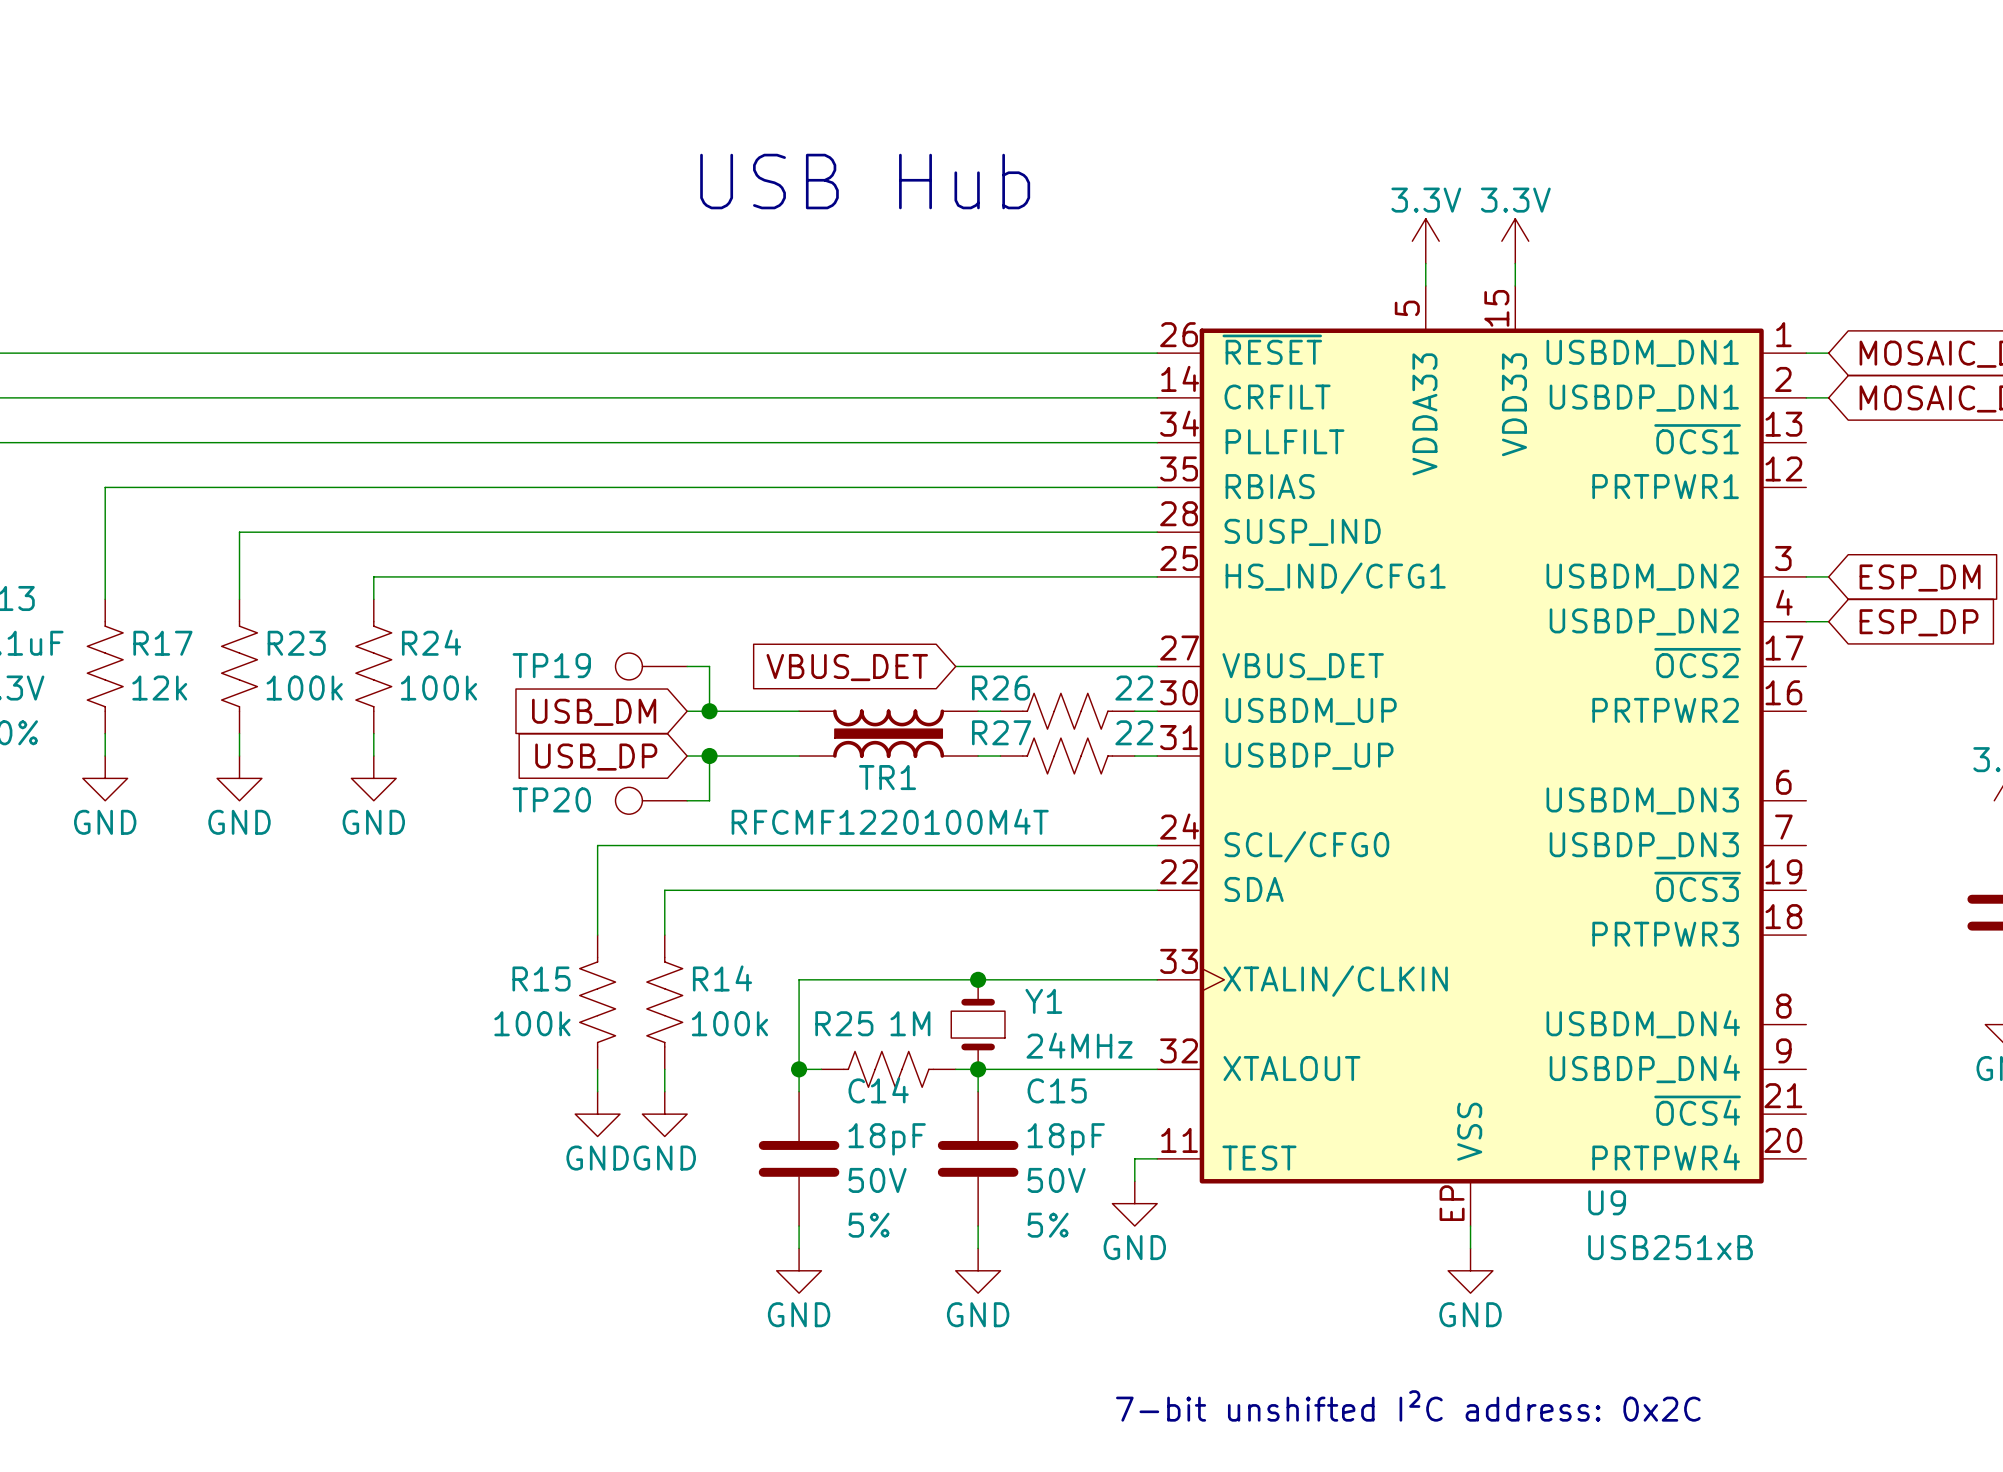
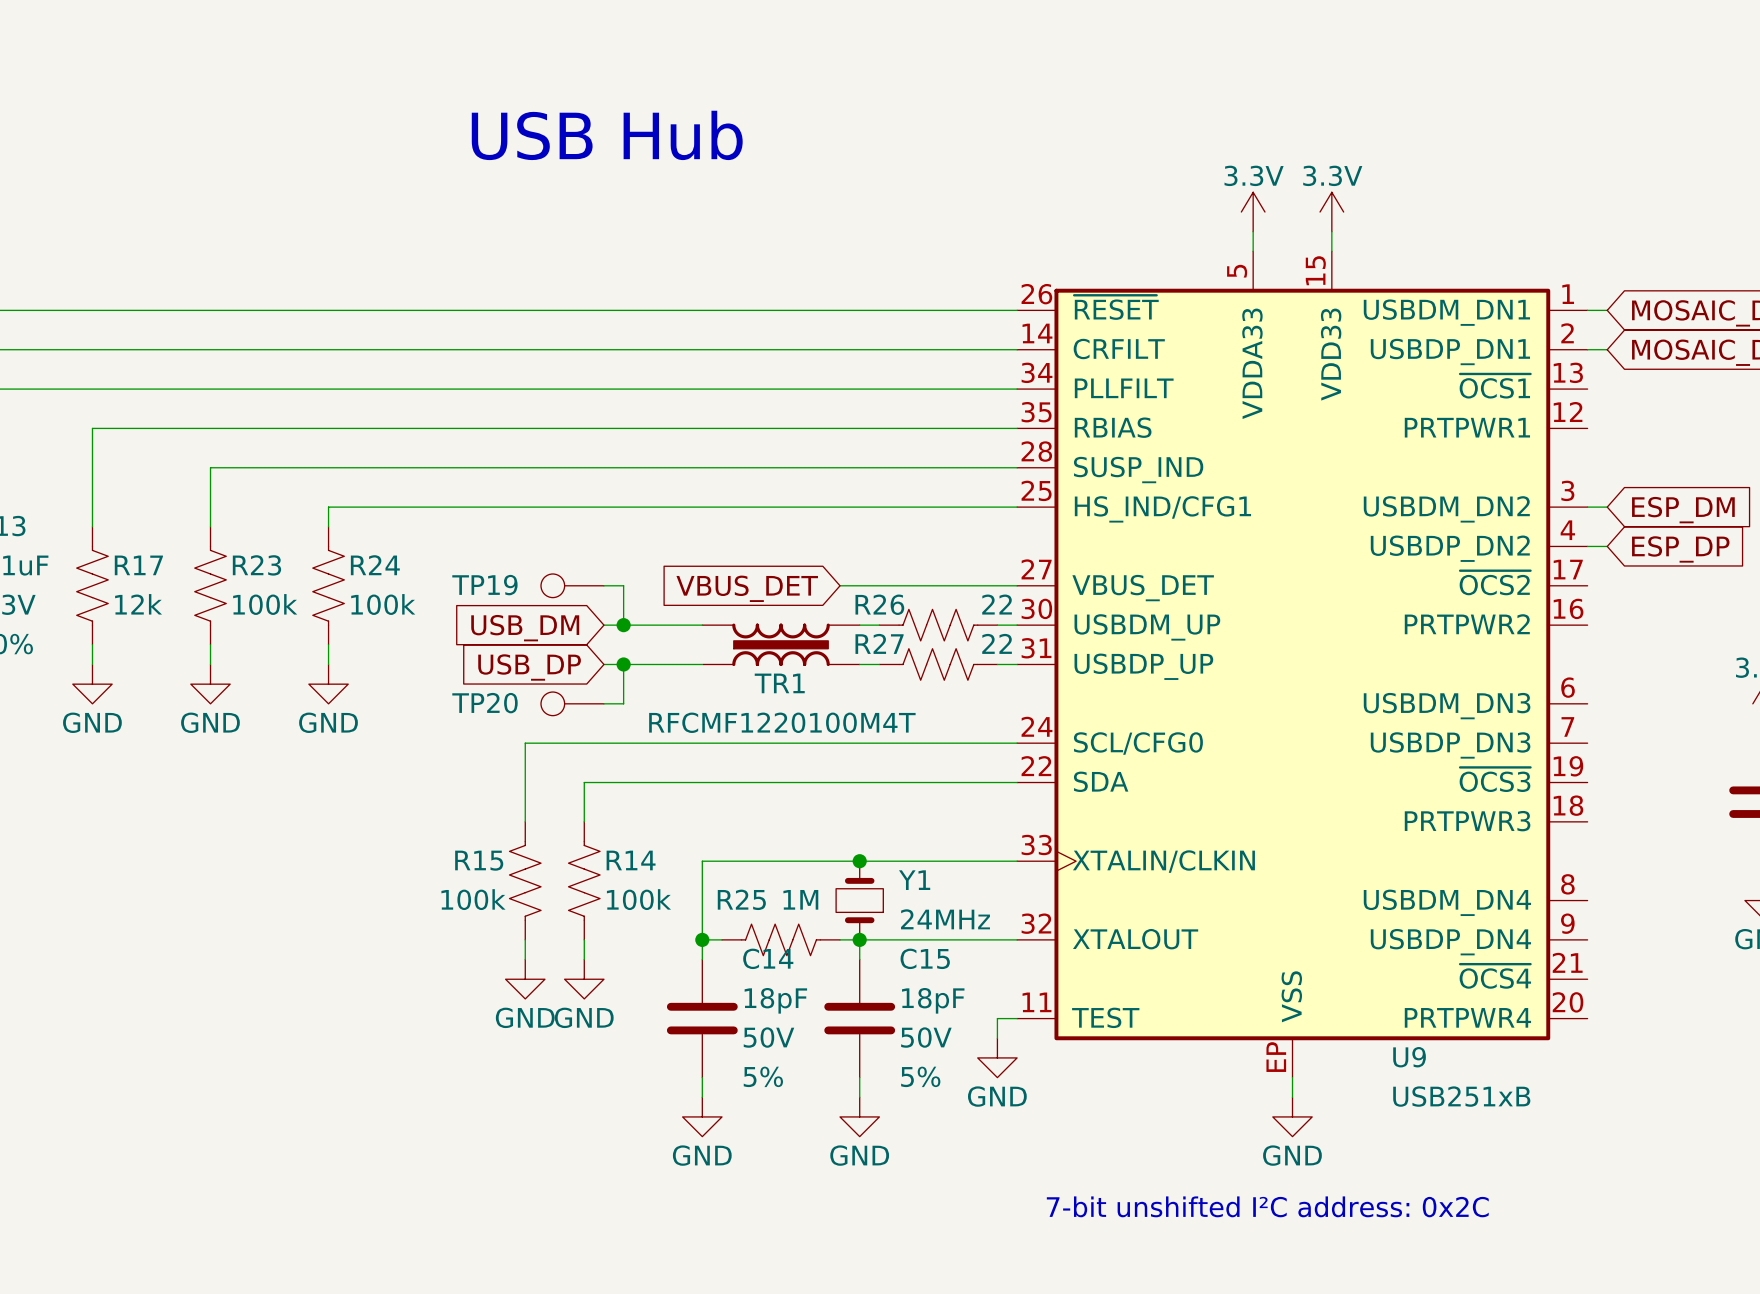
text position: USB Hub (865, 181) -> USB Hub (607, 135)
text position: 7-bit unshifted I²C address: 0x2C (1408, 1405) -> 7-bit unshifted I²C address: 0x2C (1267, 1206)

